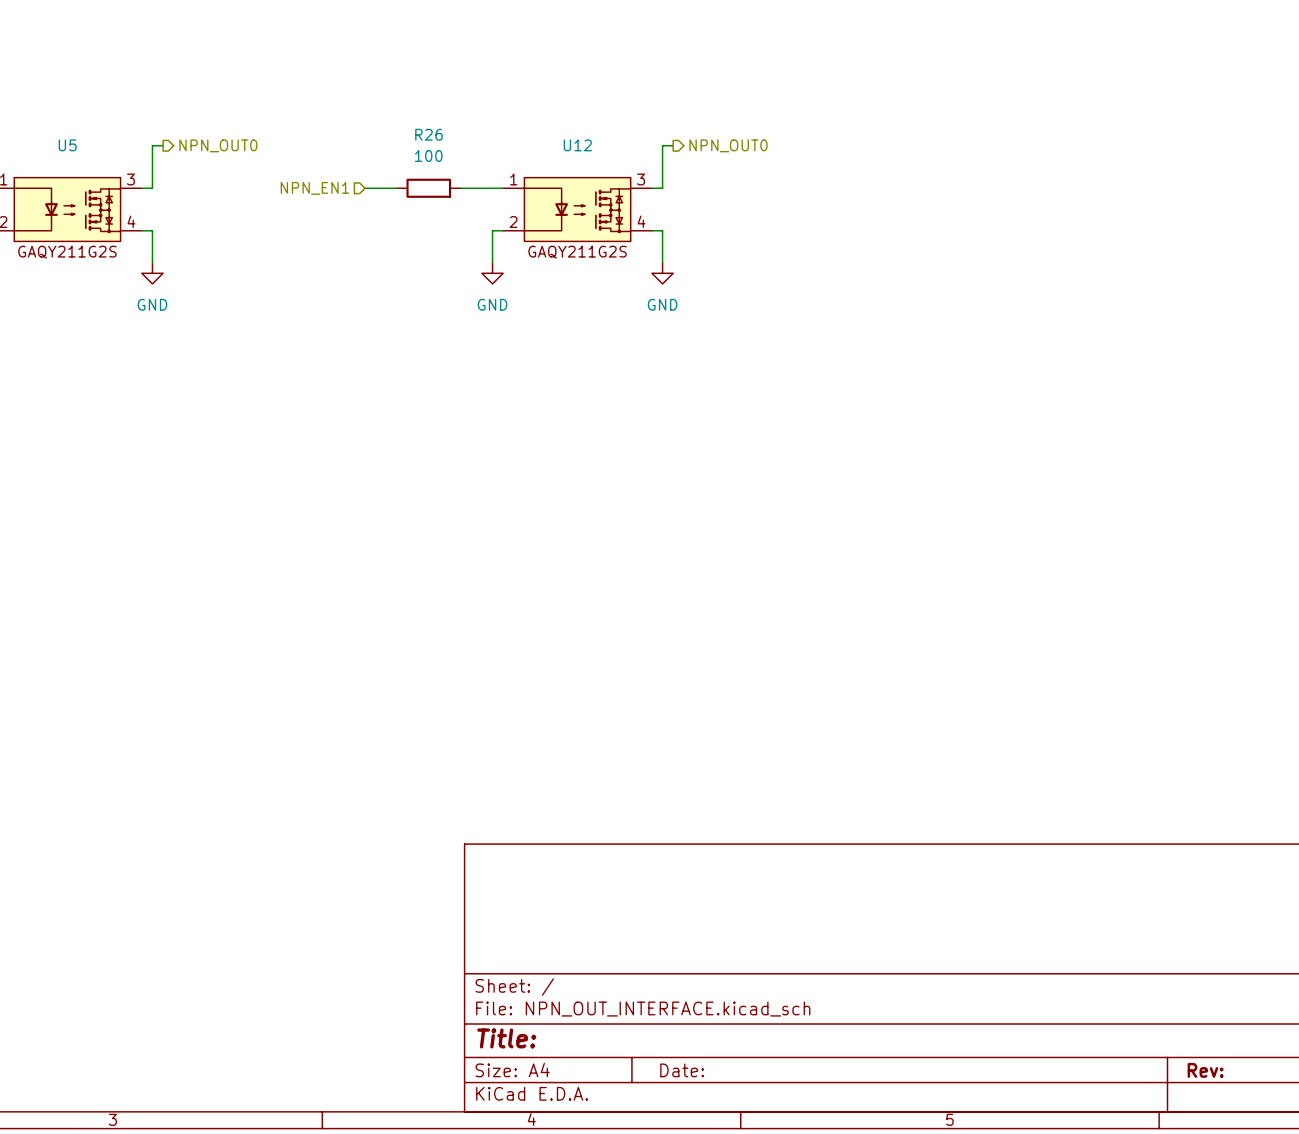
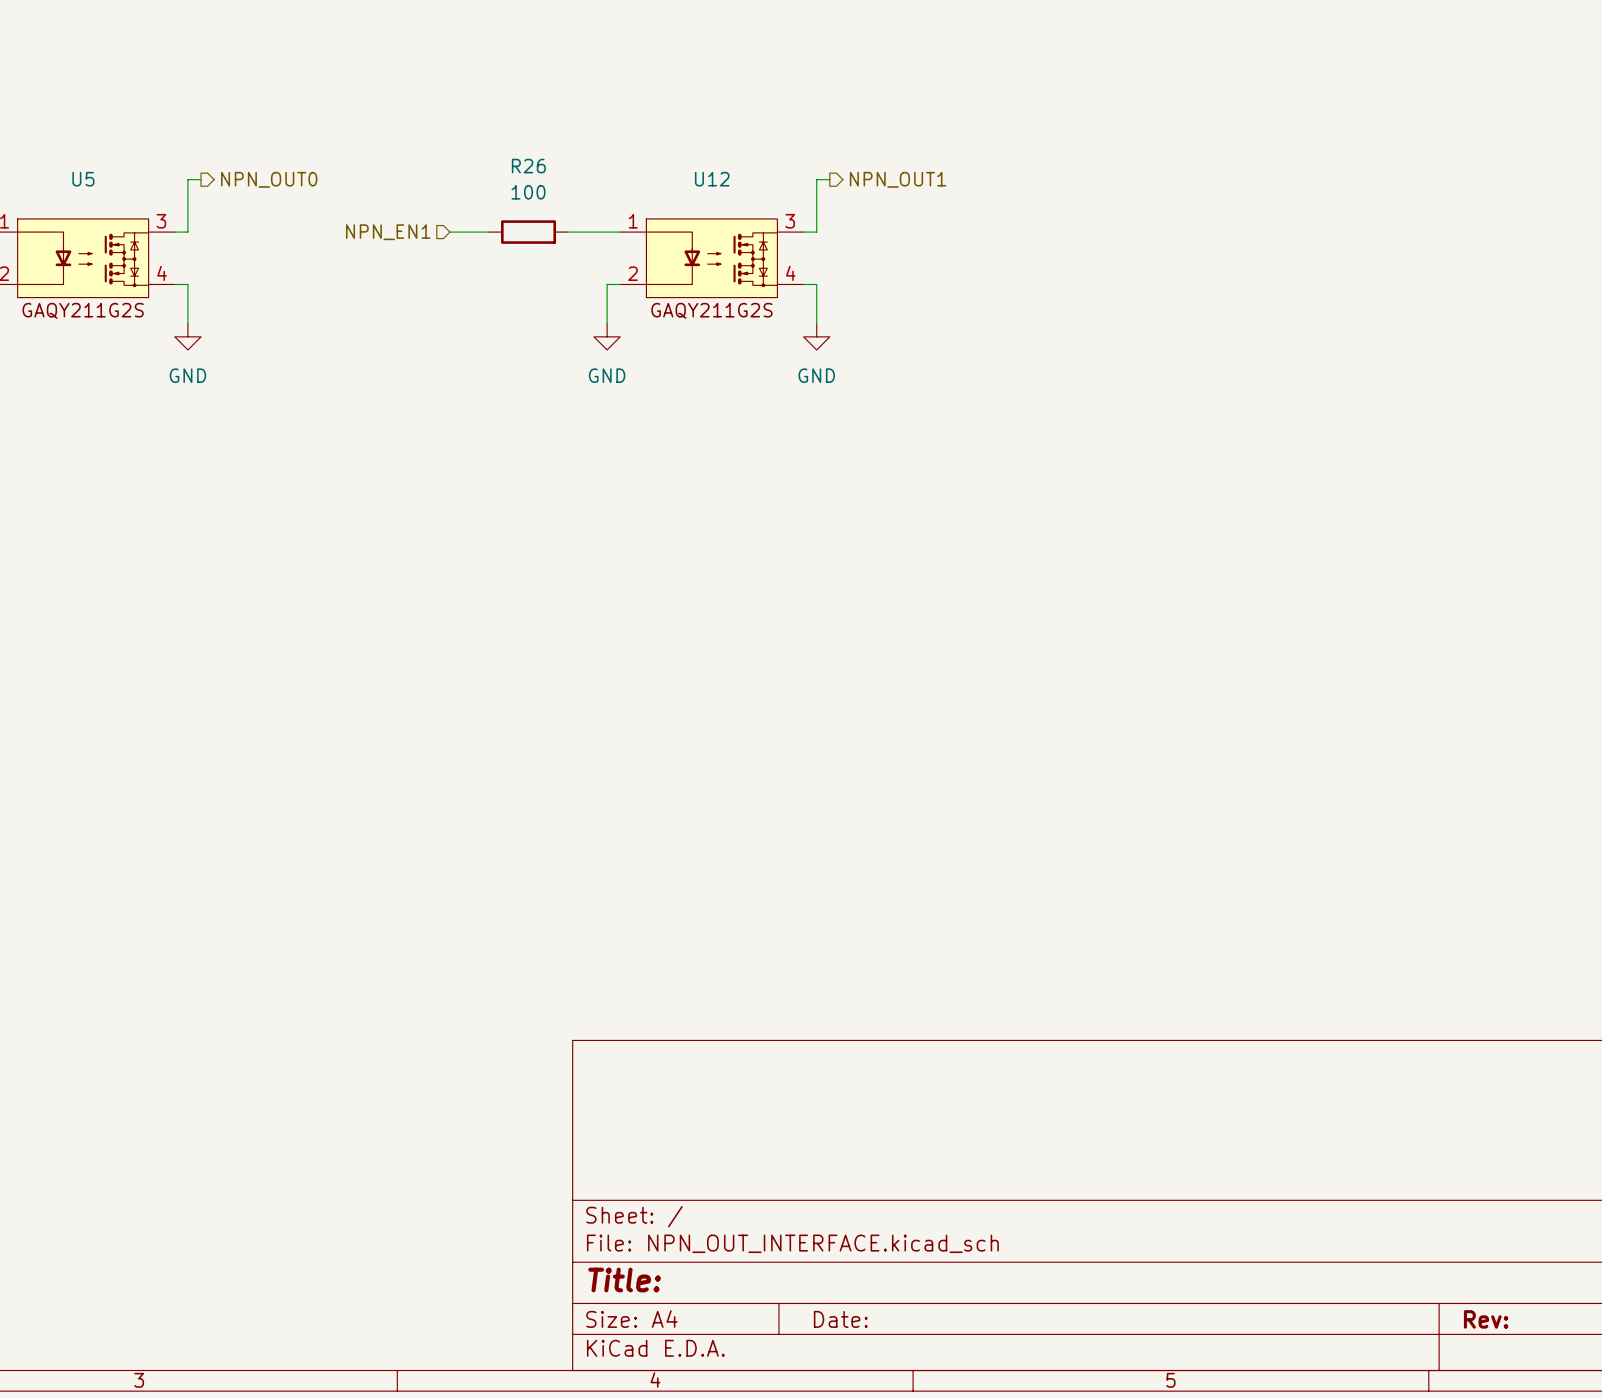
hierarchical label: NPN_OUT0 (728, 145) -> NPN_OUT1 (898, 179)

